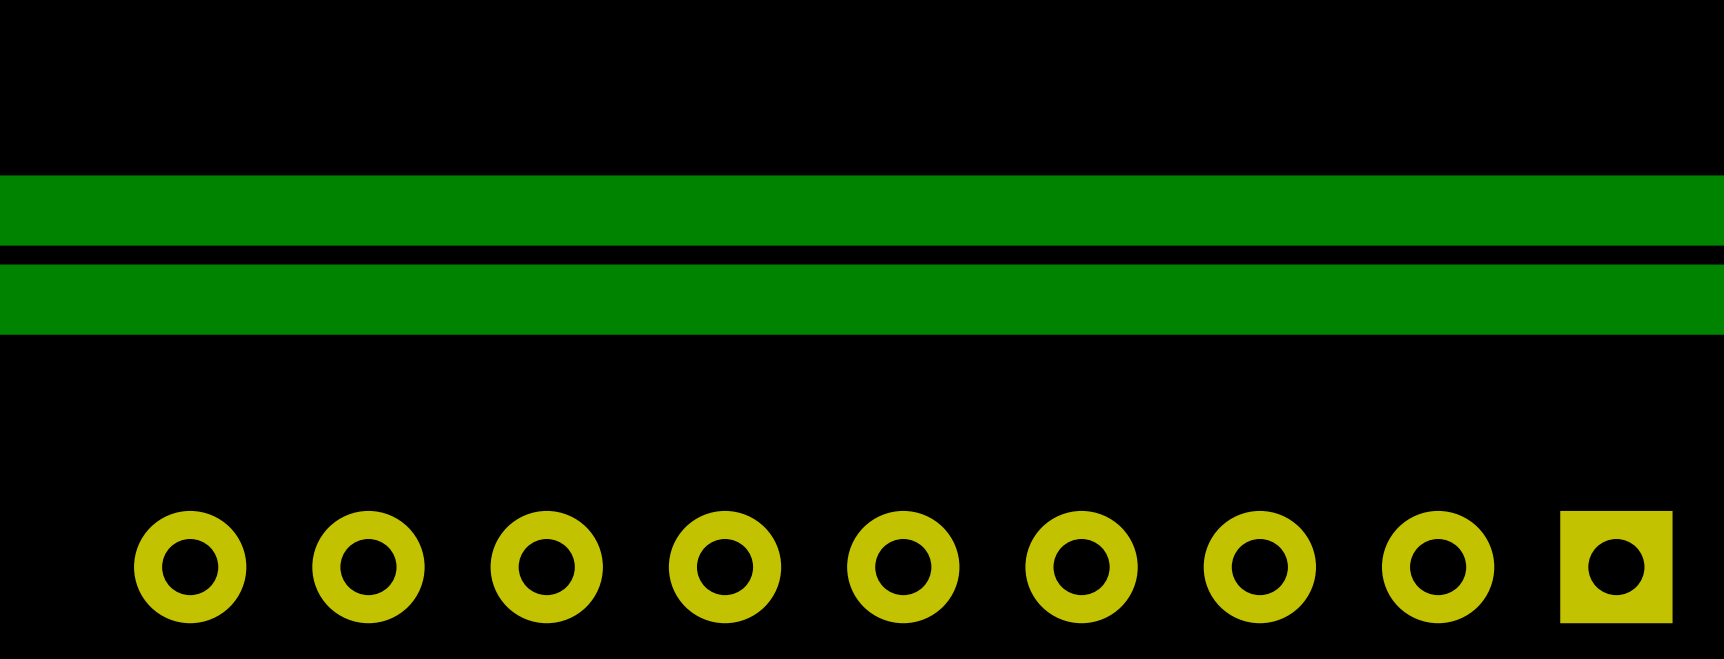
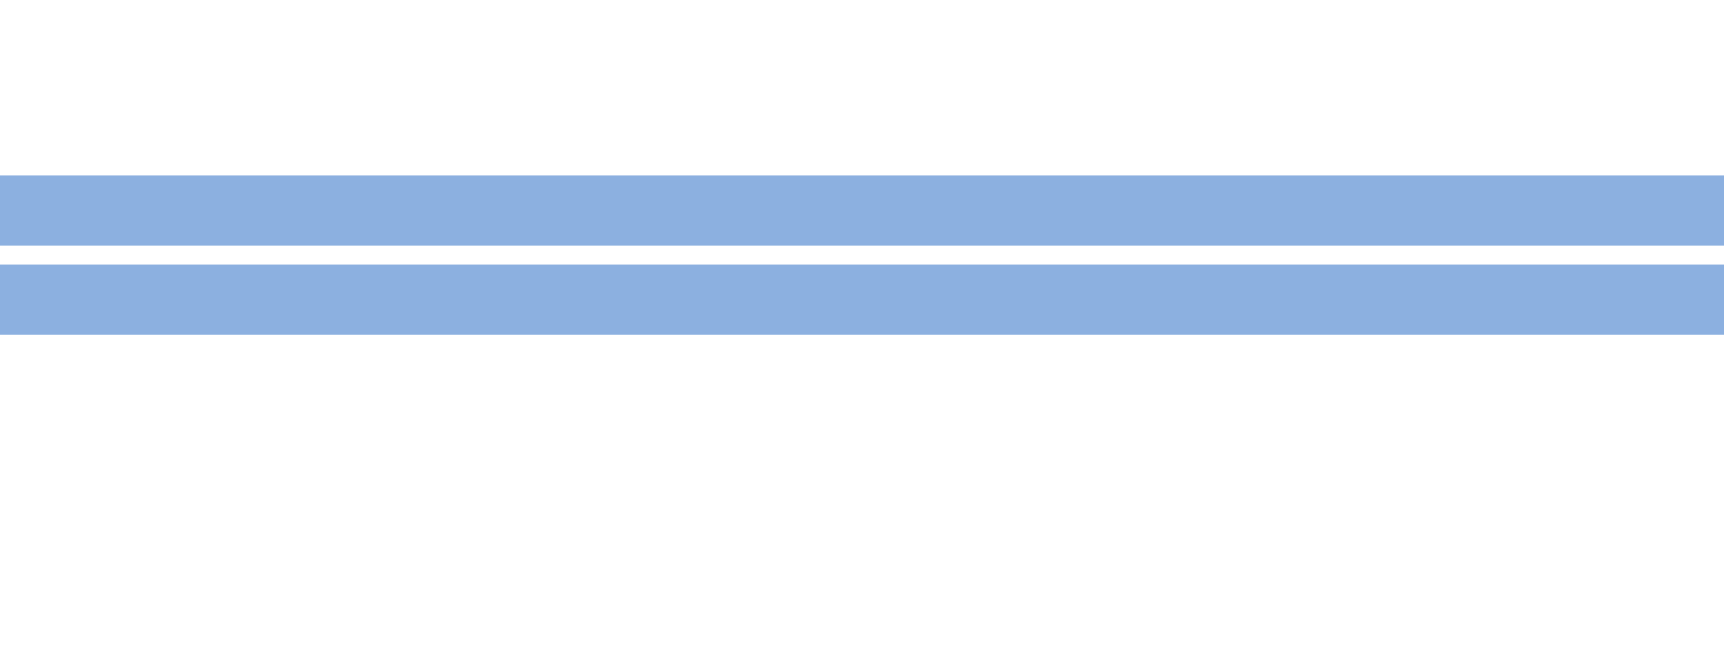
part: (903, 567) -> none

